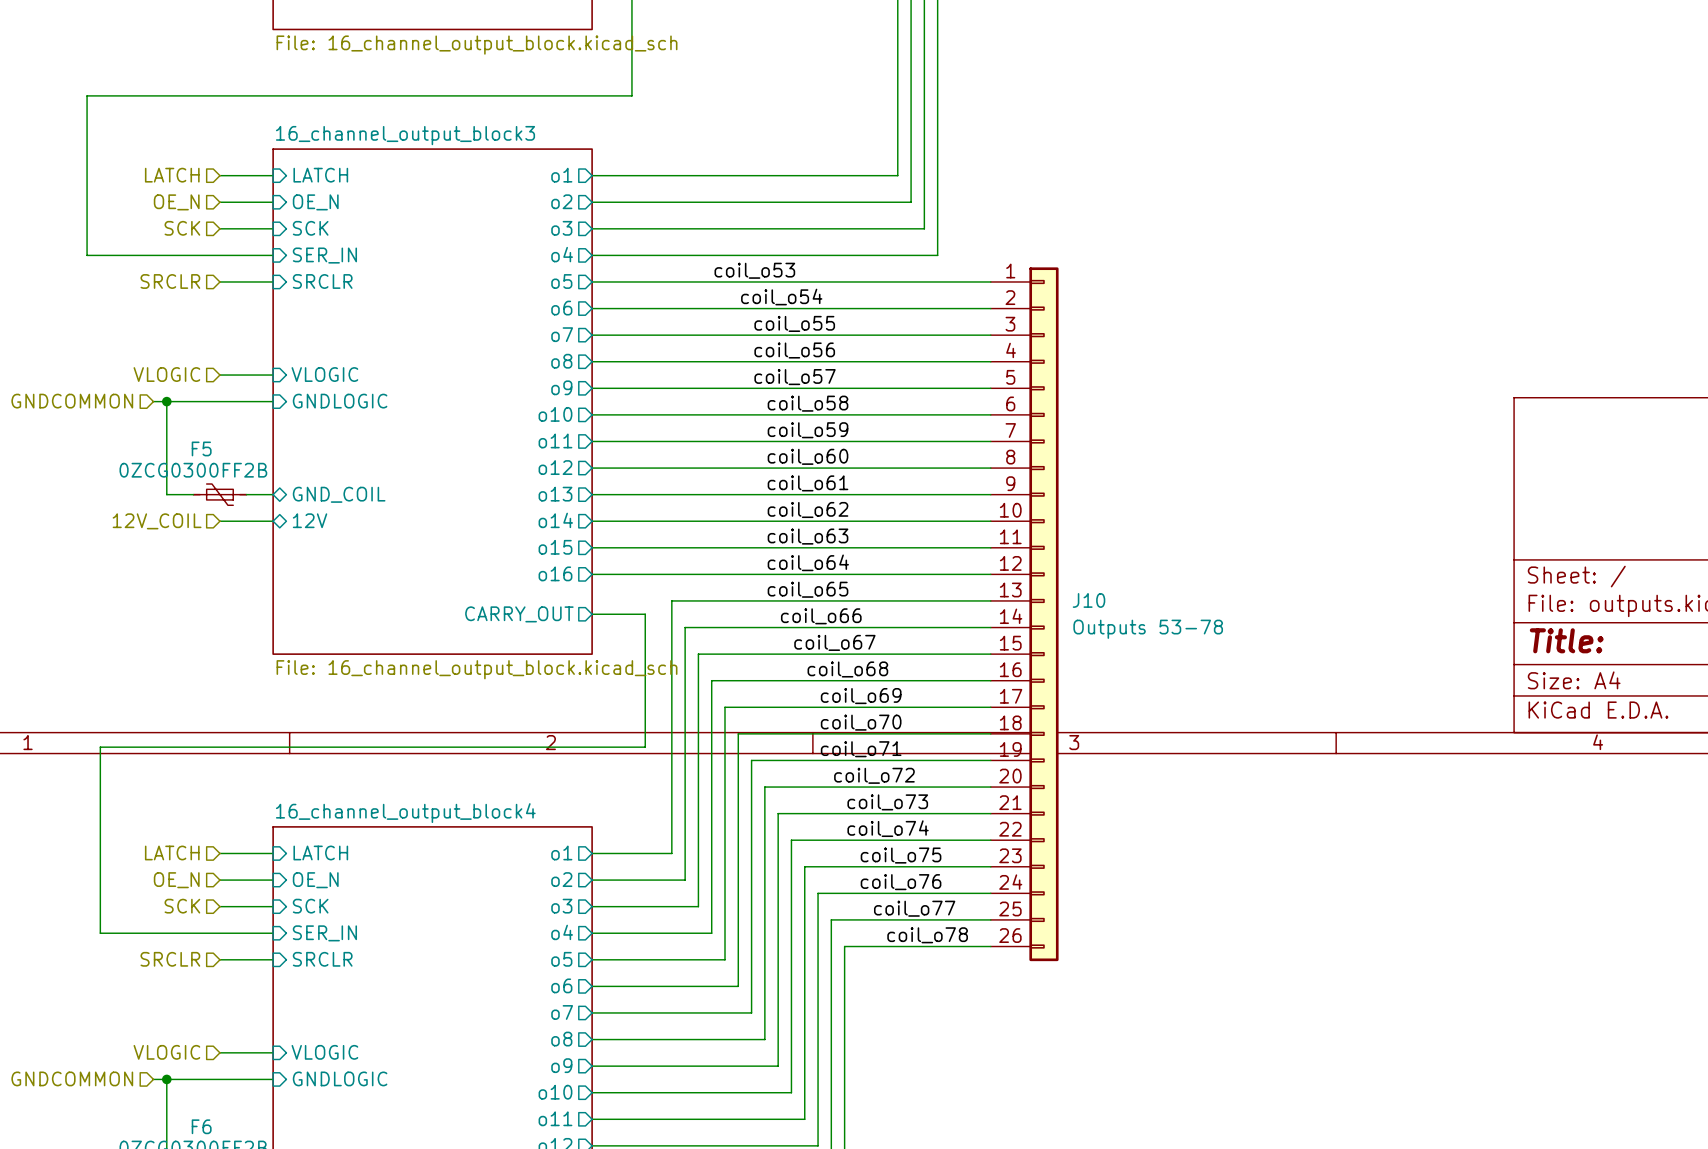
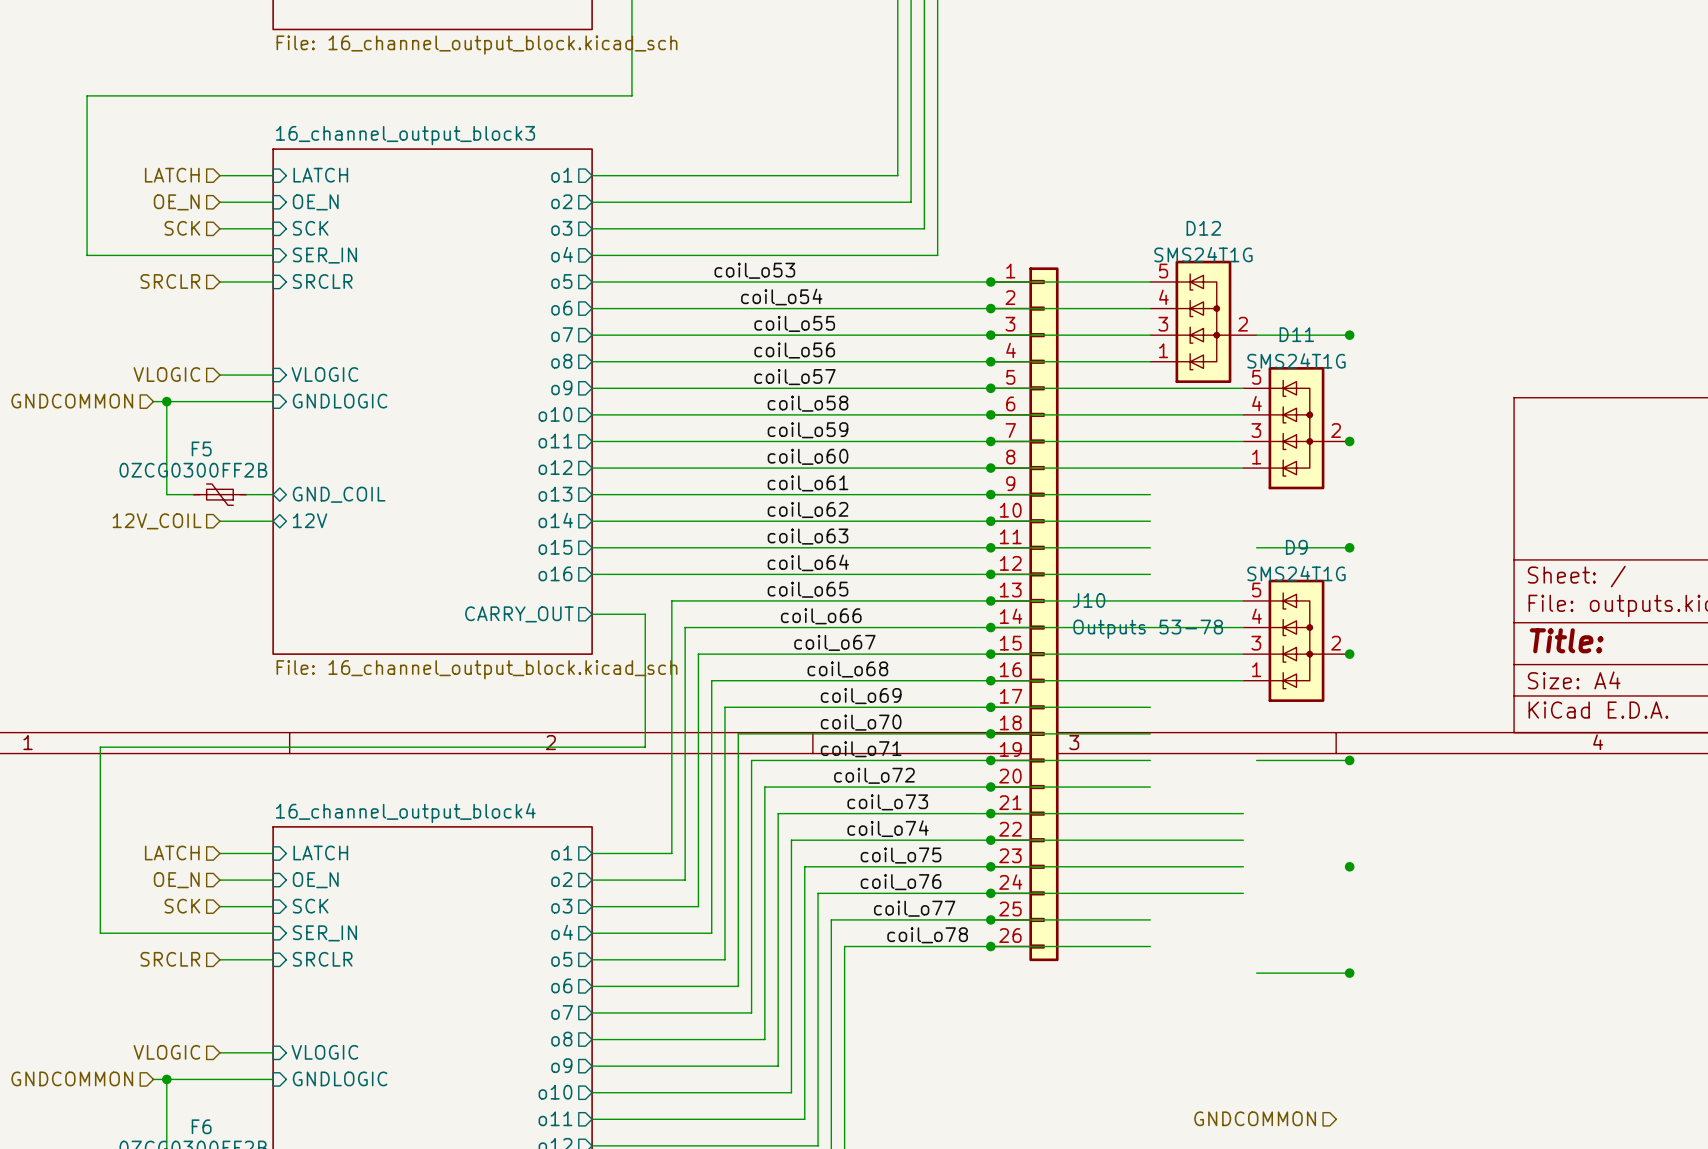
wire: none -> (990, 281) (1150, 281)
junction: none -> (990, 281)
wire: none -> (990, 308) (1150, 308)
junction: none -> (990, 308)
D12: none -> SMS24T1G (1203, 321)
wire: none -> (990, 335) (1150, 335)
junction: none -> (990, 335)
wire: none -> (1256, 335) (1349, 335)
junction: none -> (1349, 335)
wire: none -> (990, 361) (1150, 361)
junction: none -> (990, 361)
wire: none -> (990, 388) (1243, 388)
junction: none -> (990, 388)
wire: none -> (990, 414) (1243, 414)
junction: none -> (990, 414)
D11: none -> SMS24T1G (1296, 428)
wire: none -> (990, 441) (1243, 441)
junction: none -> (990, 441)
junction: none -> (1349, 441)
wire: none -> (990, 468) (1243, 468)
junction: none -> (990, 468)
wire: none -> (990, 494) (1150, 494)
junction: none -> (990, 494)
wire: none -> (990, 521) (1150, 521)
junction: none -> (990, 521)
wire: none -> (990, 547) (1150, 547)
junction: none -> (990, 547)
wire: none -> (1256, 547) (1349, 547)
junction: none -> (1349, 547)
wire: none -> (990, 574) (1150, 574)
junction: none -> (990, 574)
wire: none -> (990, 600) (1243, 600)
junction: none -> (990, 600)
wire: none -> (990, 627) (1243, 627)
junction: none -> (990, 627)
D9: none -> SMS24T1G (1296, 640)
wire: none -> (990, 654) (1243, 654)
junction: none -> (990, 654)
junction: none -> (1349, 654)
wire: none -> (990, 680) (1243, 680)
junction: none -> (990, 680)
wire: none -> (990, 707) (1150, 707)
junction: none -> (990, 707)
wire: none -> (990, 733) (1150, 733)
junction: none -> (990, 733)
wire: none -> (990, 760) (1150, 760)
junction: none -> (990, 760)
wire: none -> (1256, 760) (1349, 760)
junction: none -> (1349, 760)
wire: none -> (990, 787) (1150, 787)
junction: none -> (990, 787)
wire: none -> (990, 813) (1243, 813)
junction: none -> (990, 813)
wire: none -> (990, 840) (1243, 840)
junction: none -> (990, 840)
wire: none -> (990, 866) (1243, 866)
junction: none -> (990, 866)
junction: none -> (1349, 866)
wire: none -> (990, 893) (1243, 893)
junction: none -> (990, 893)
wire: none -> (990, 919) (1150, 919)
junction: none -> (990, 919)
wire: none -> (990, 946) (1150, 946)
junction: none -> (990, 946)
wire: none -> (1256, 973) (1349, 973)
junction: none -> (1349, 973)
hierarchical label: none -> GNDCOMMON (1255, 1118)

